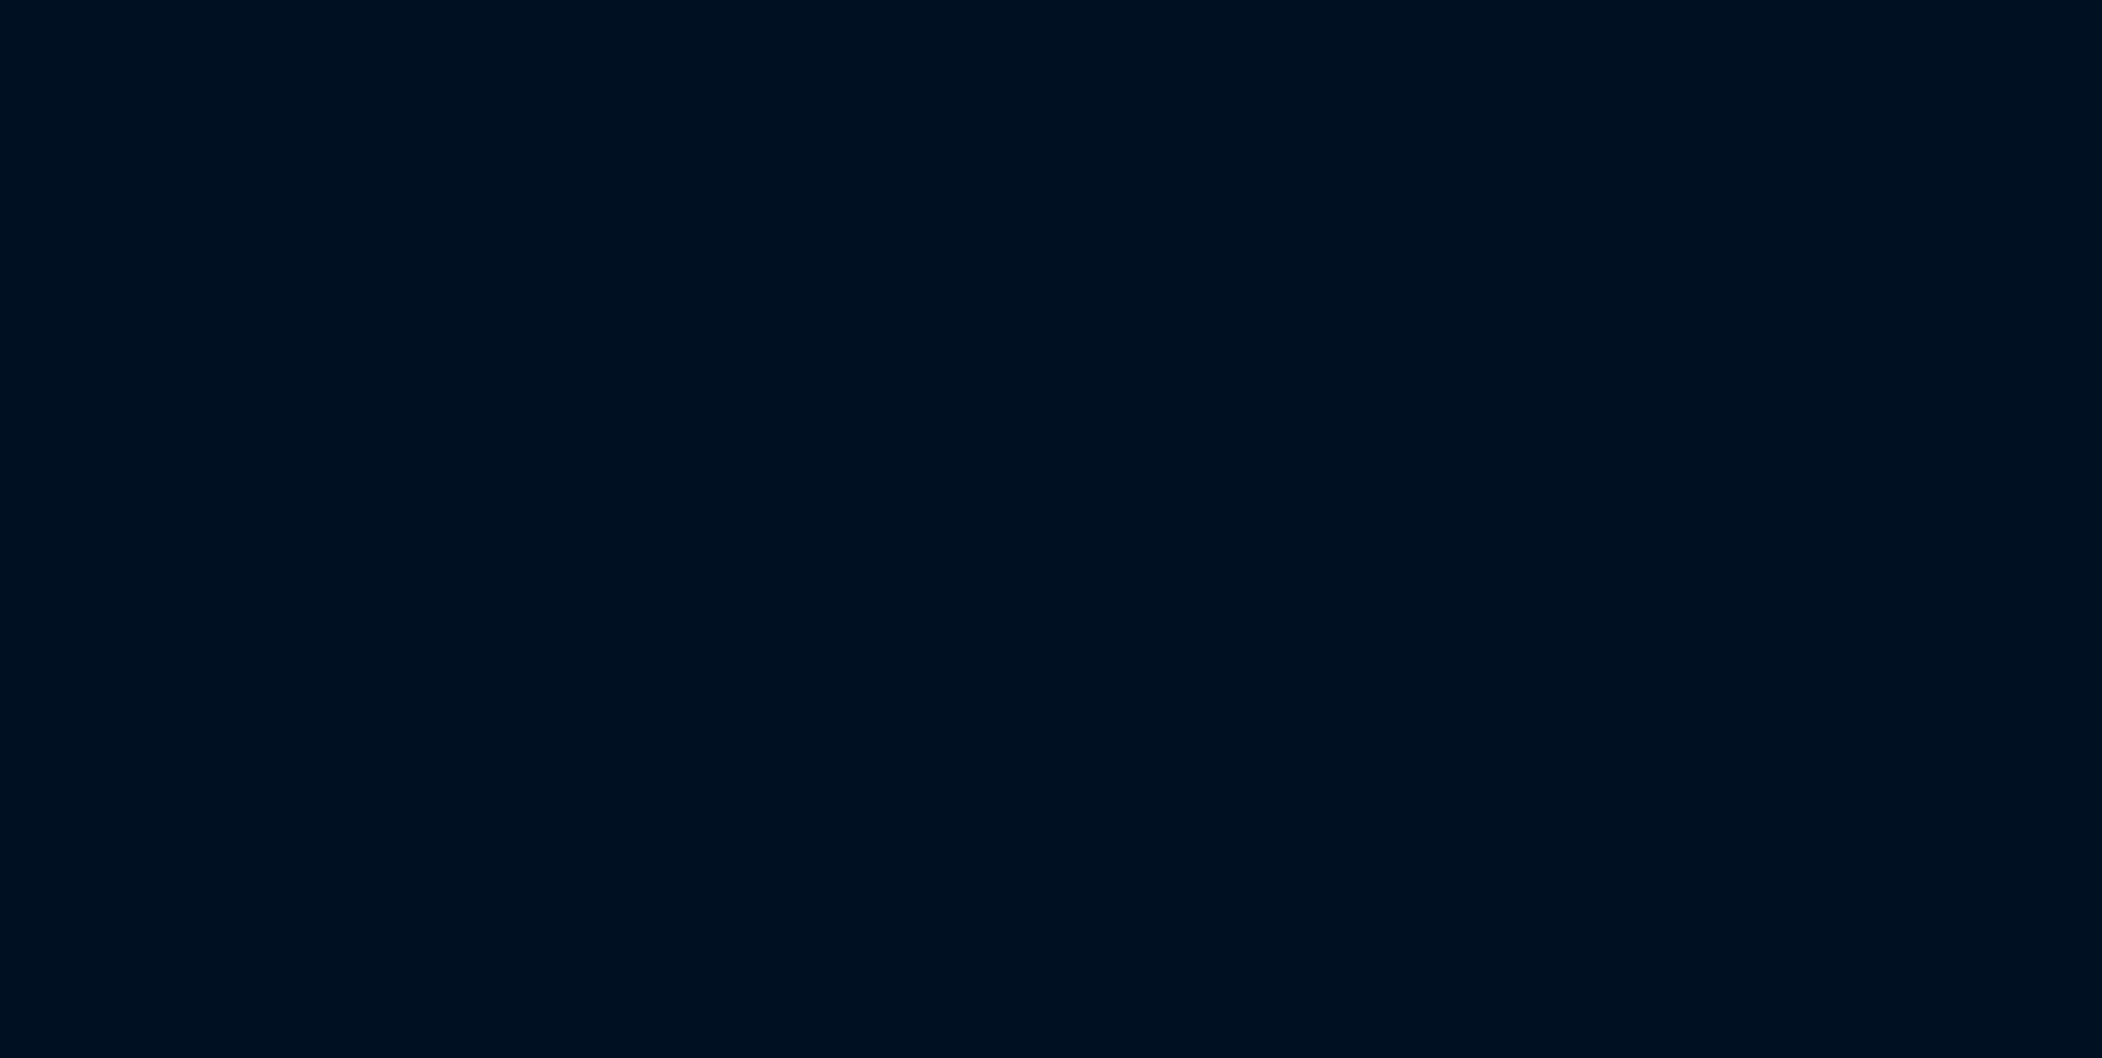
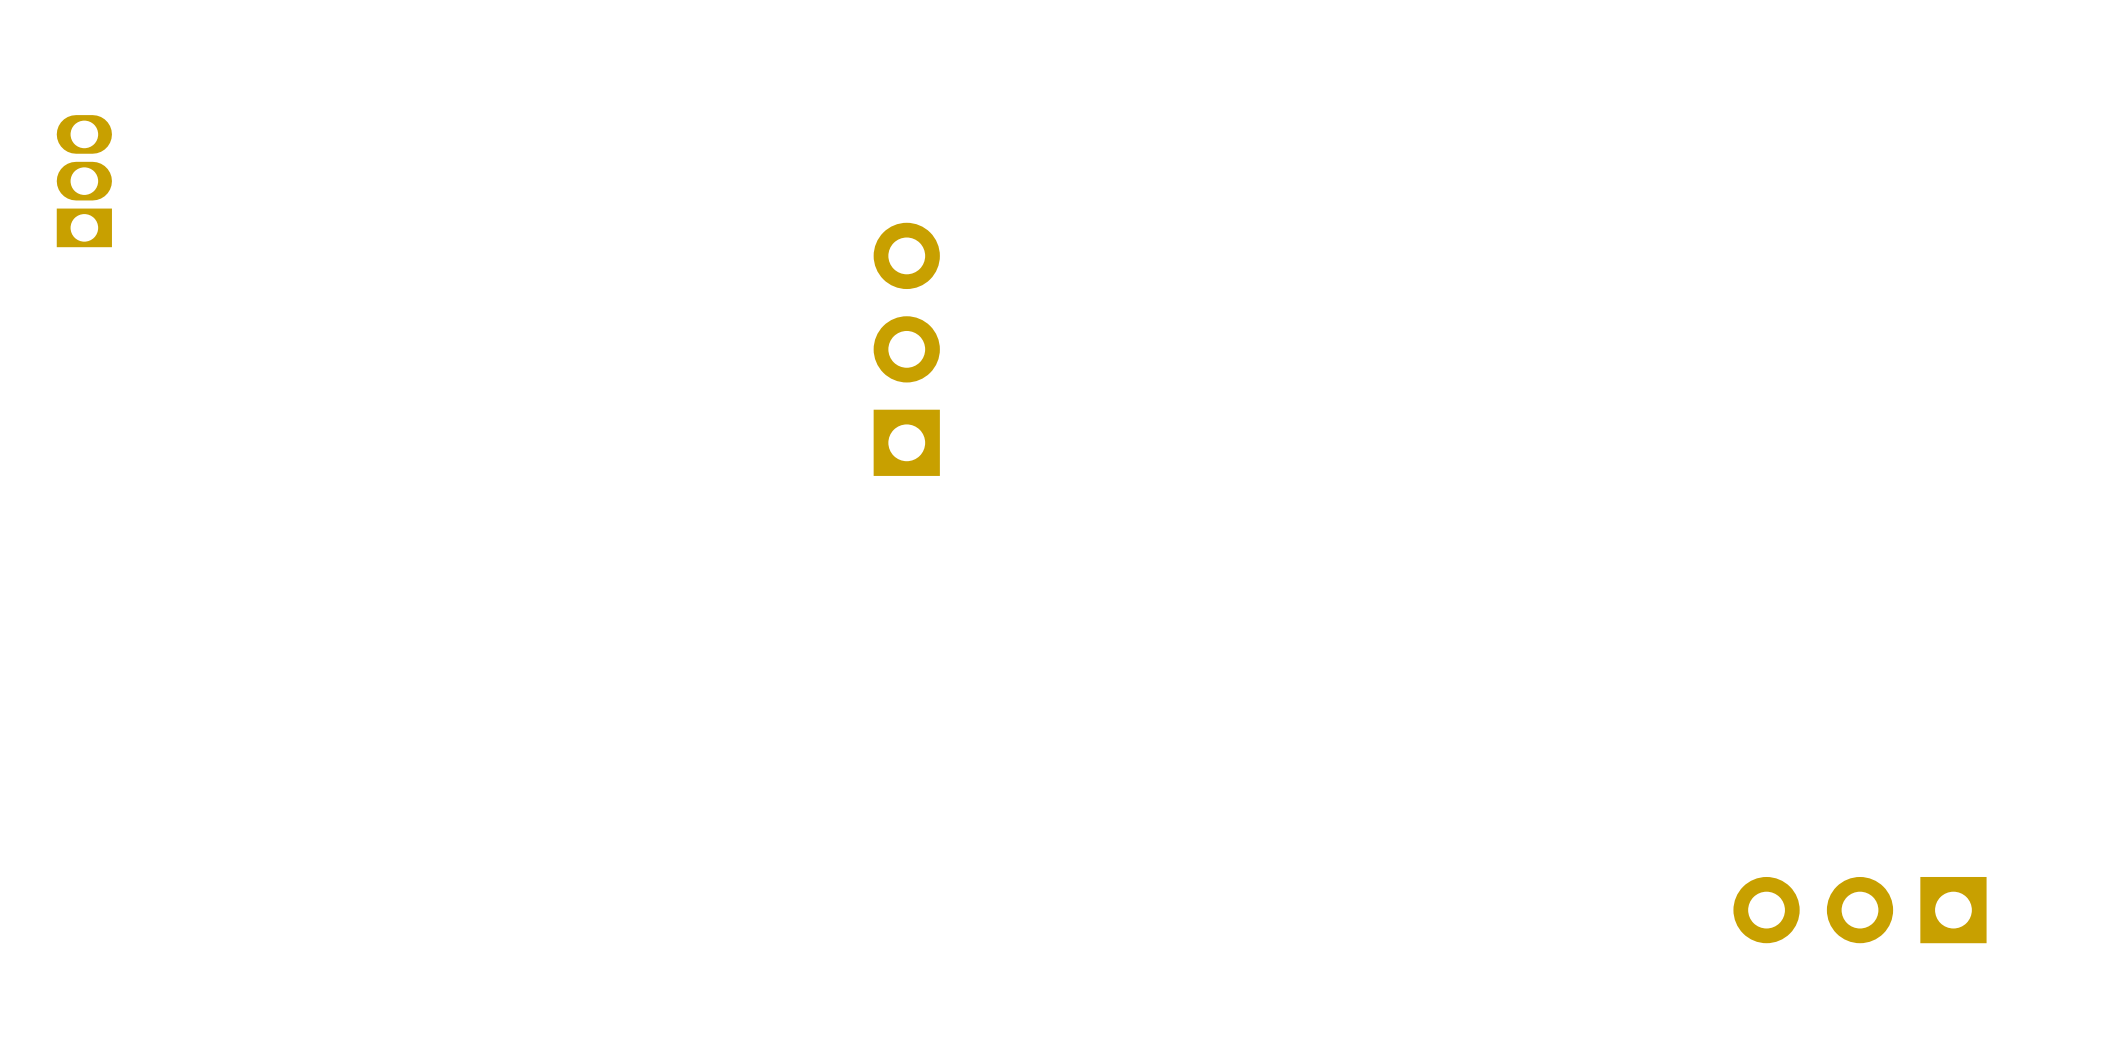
part: none -> (84, 181)
part: none -> (906, 349)
part: none -> (1860, 910)

